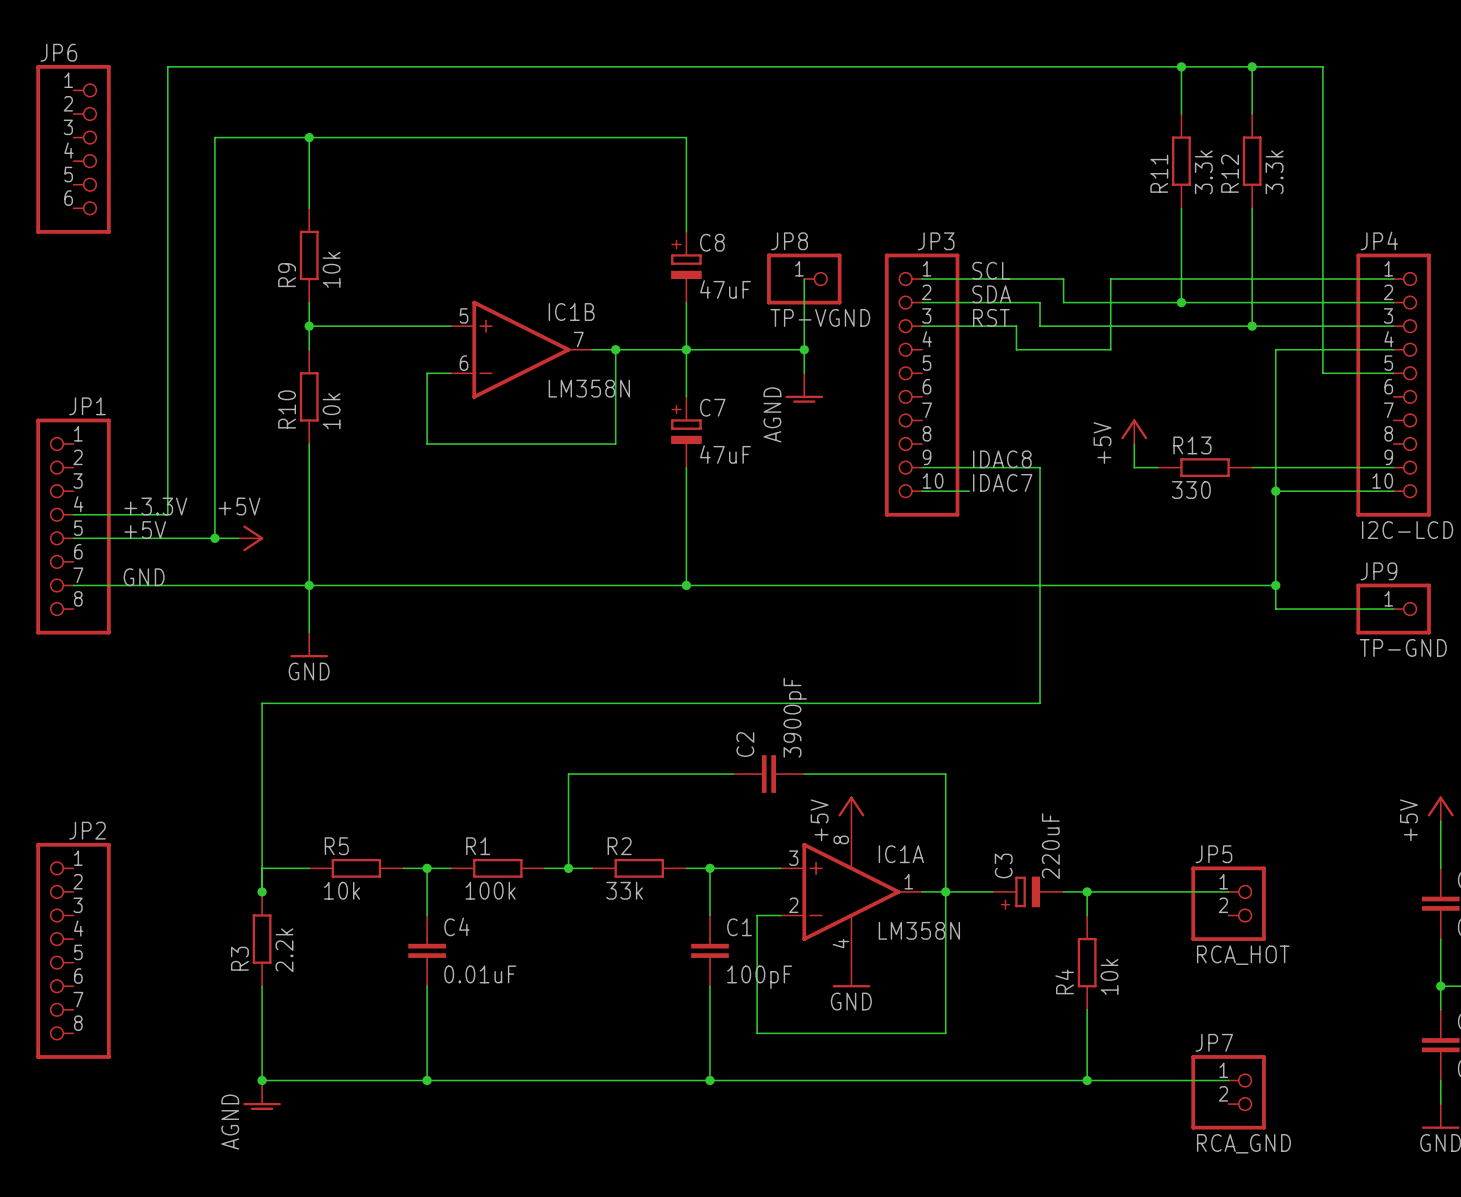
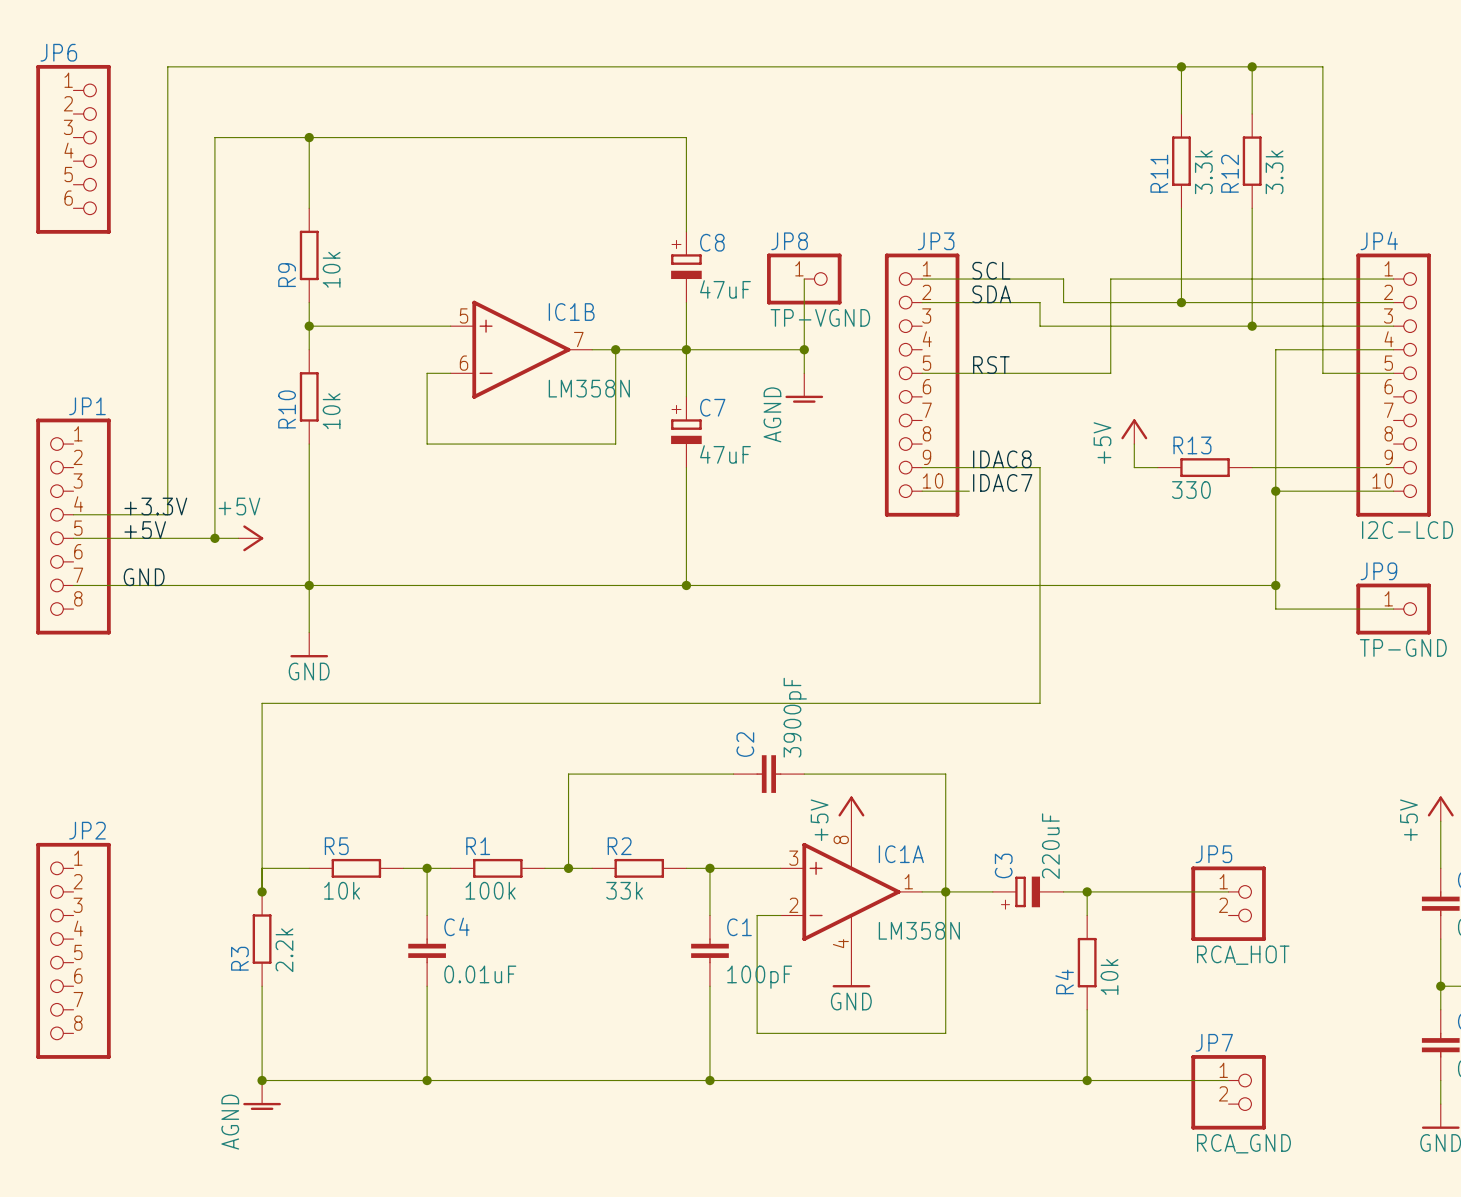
label position: RST (991, 317) -> RST (991, 365)
wire: (922, 326) (1016, 326) (1016, 349) (1110, 349) -> (922, 373) (1110, 373) (1110, 349)

